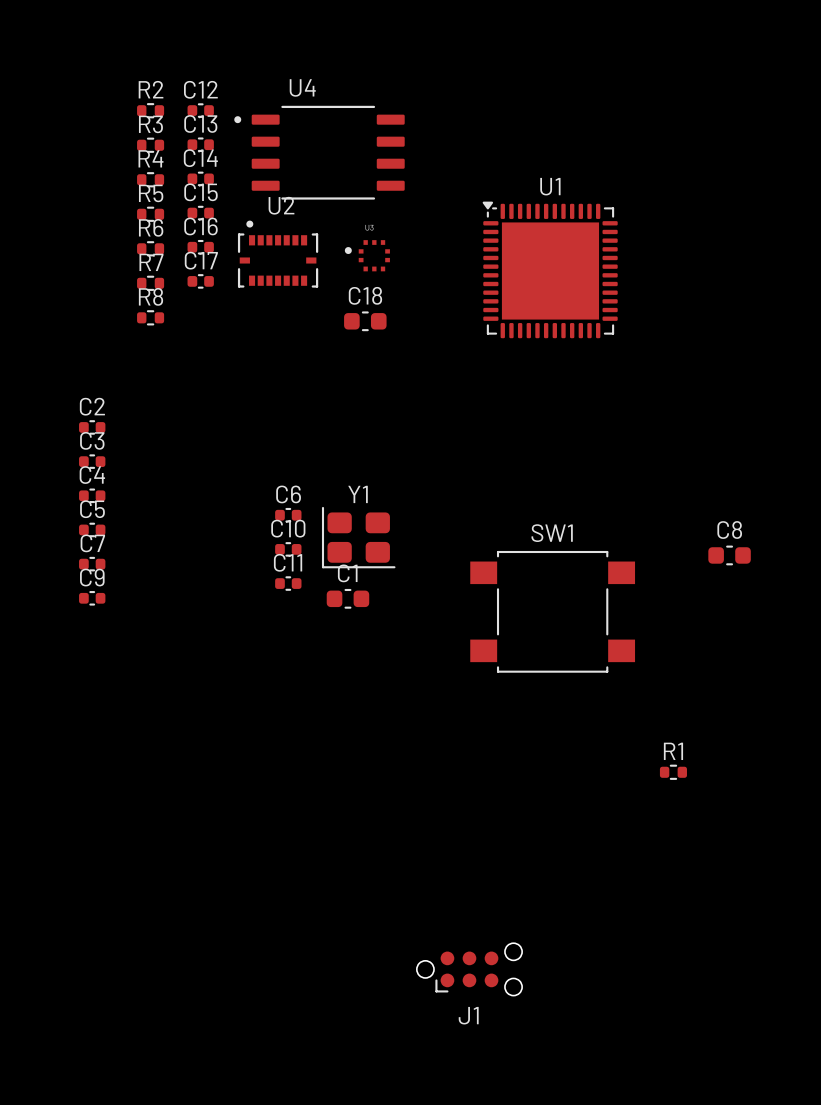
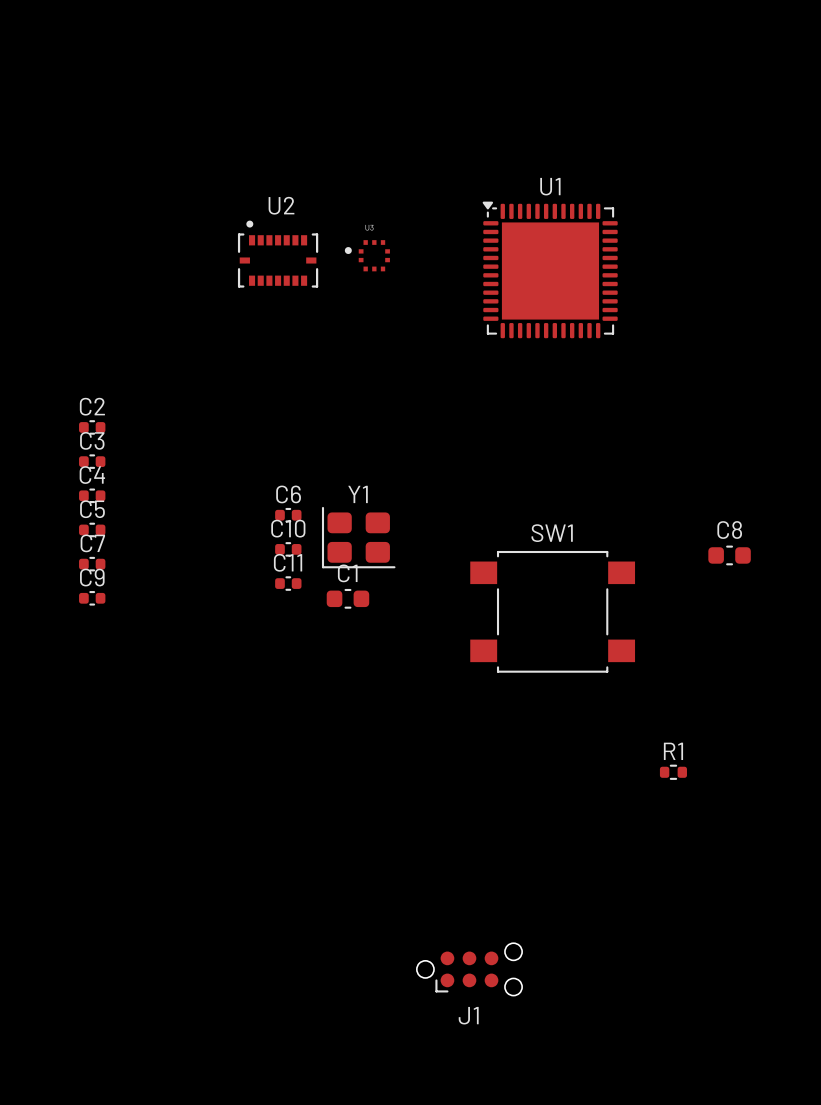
R2: (150, 110) -> none
C12: (200, 110) -> none
C13: (200, 144) -> none
R3: (150, 145) -> none
U4: (319, 152) -> none
C14: (200, 178) -> none
R4: (150, 179) -> none
C15: (200, 213) -> none
R5: (150, 214) -> none
C16: (200, 247) -> none
R6: (150, 248) -> none
C17: (200, 281) -> none
R7: (150, 283) -> none
R8: (150, 317) -> none
C18: (365, 321) -> none

